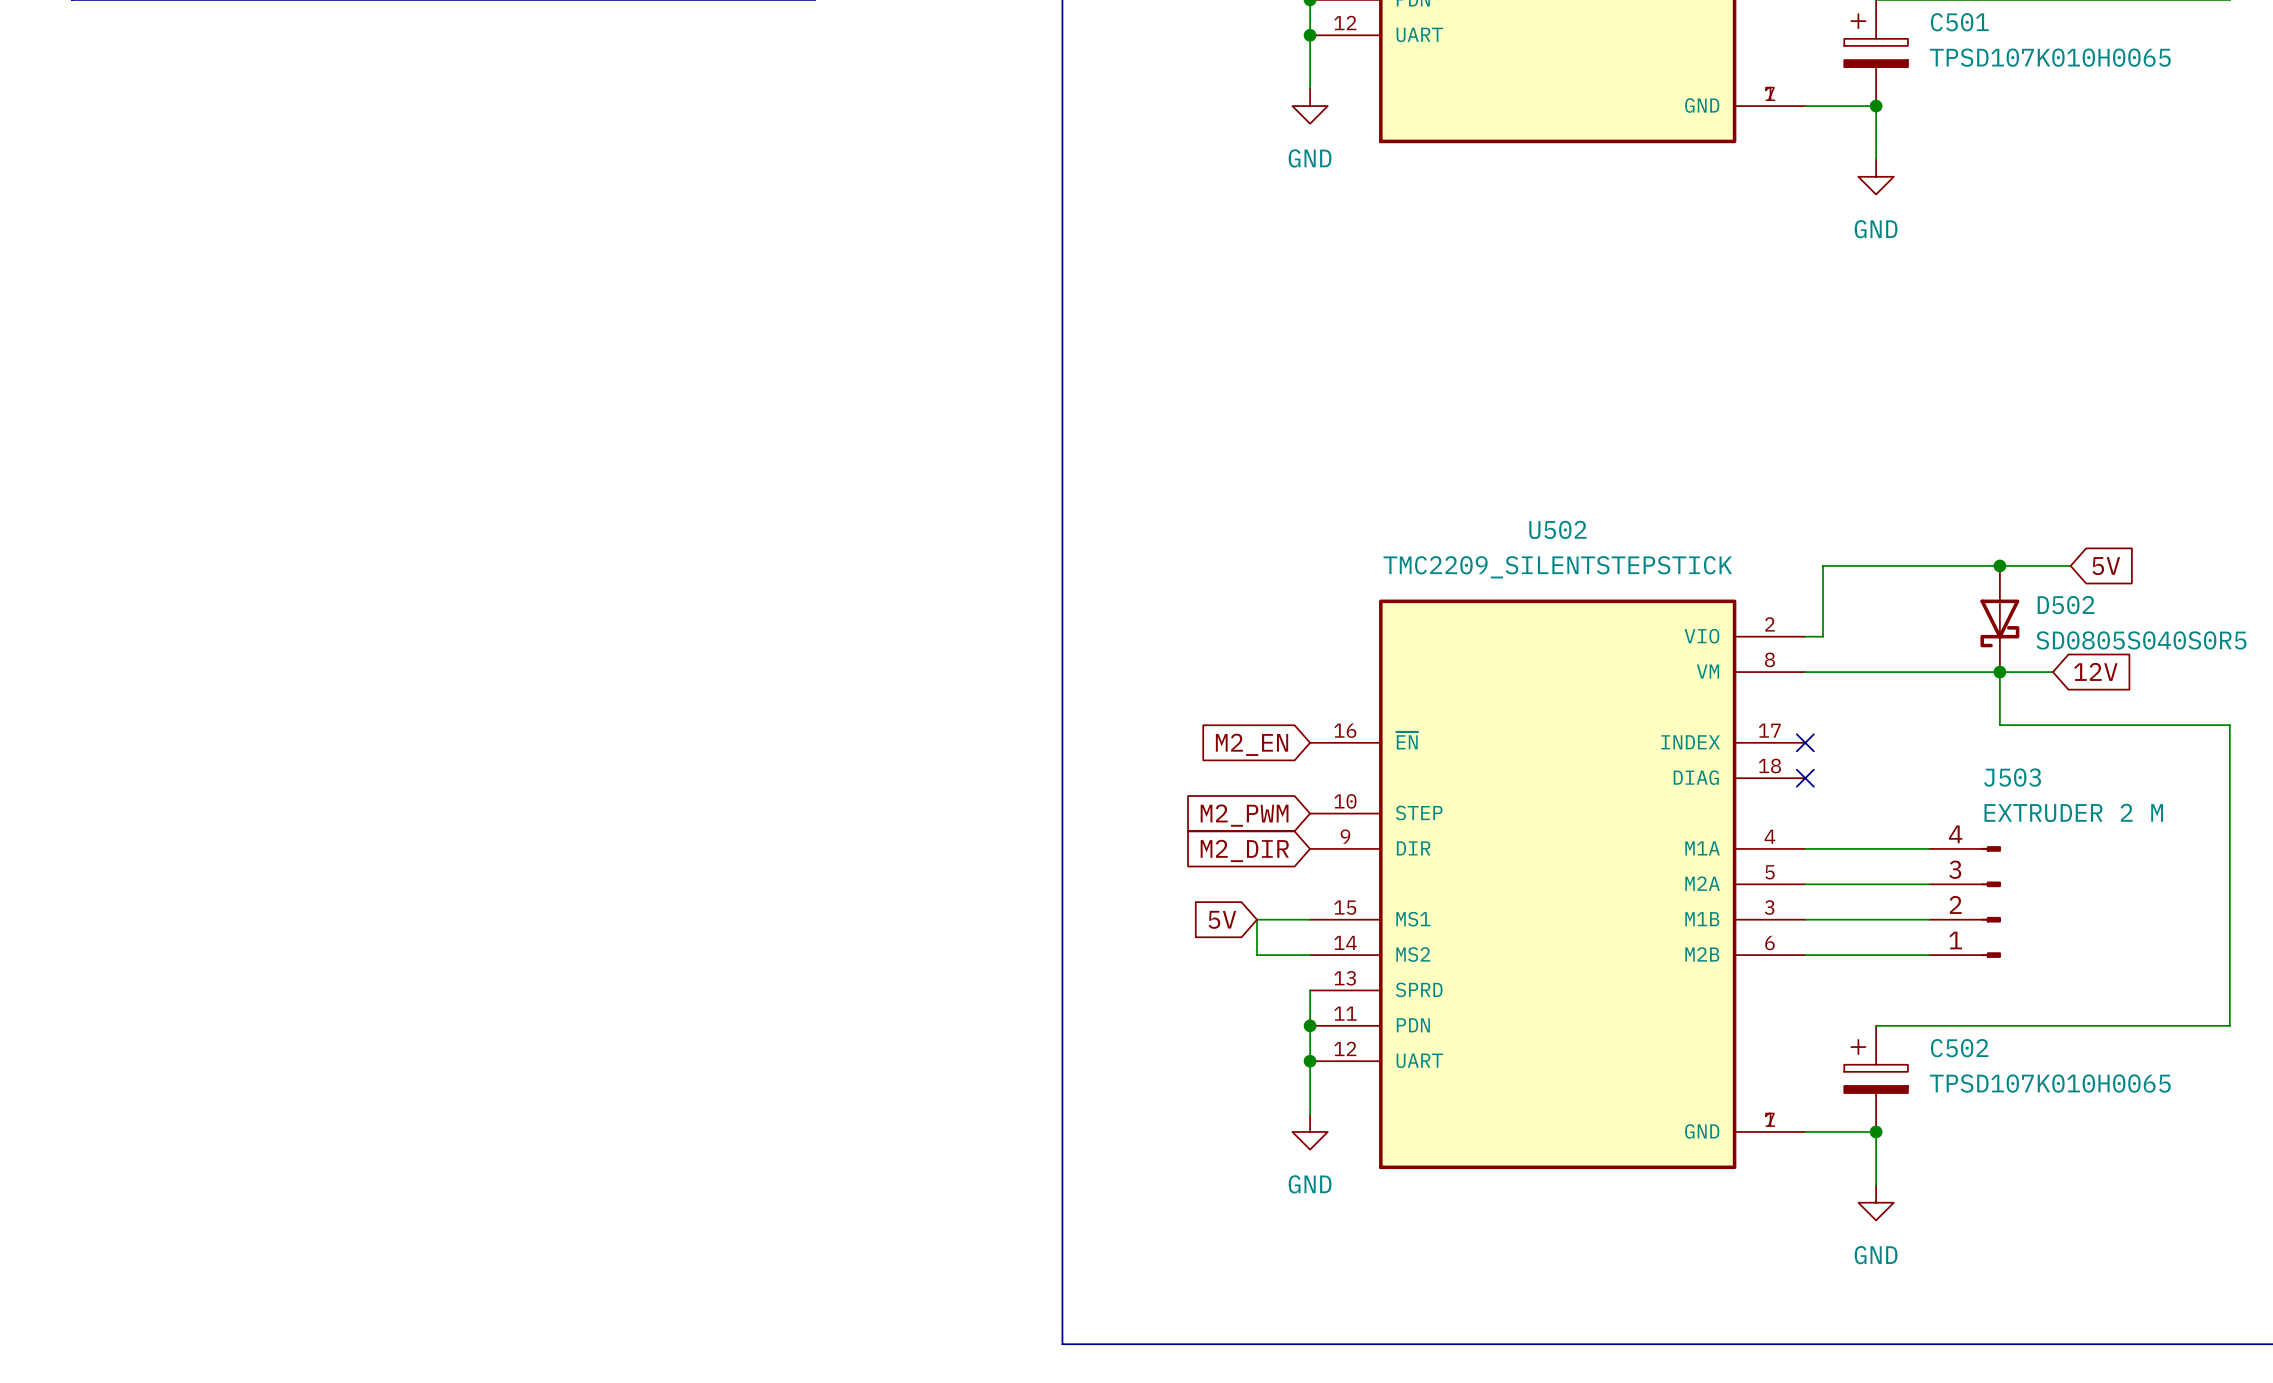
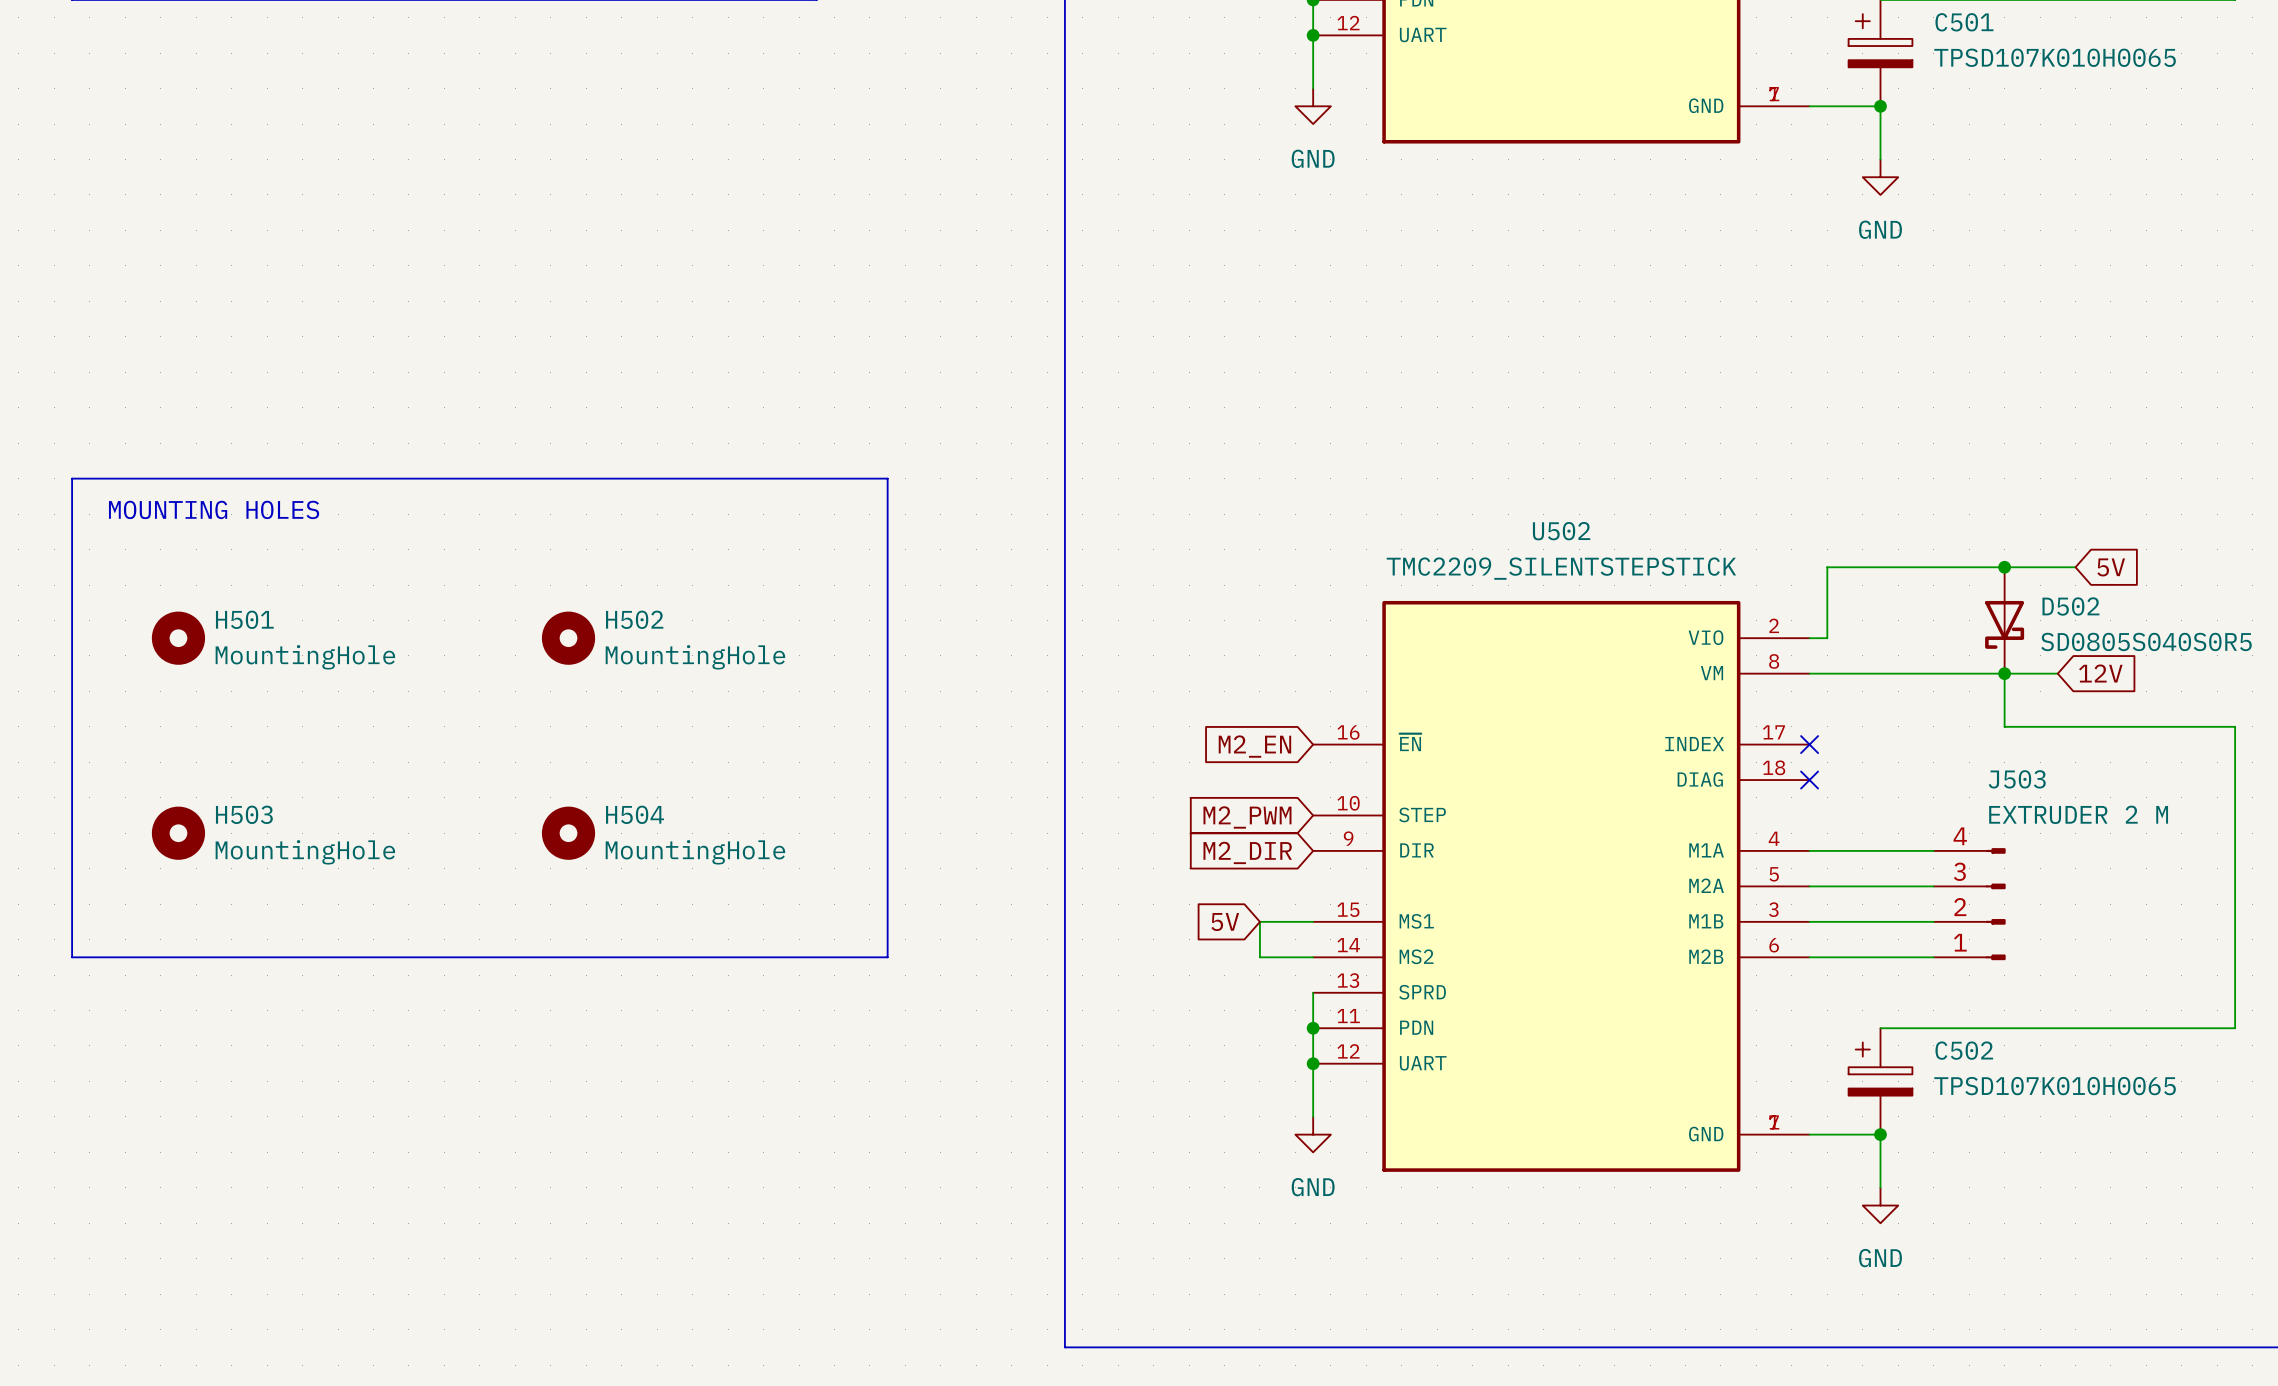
line: none -> (72, 478) (887, 478) (887, 957) (72, 957) (72, 478)
text: none -> MOUNTING HOLES (214, 509)
H501: none -> MountingHole (178, 638)
H502: none -> MountingHole (568, 638)
H503: none -> MountingHole (178, 833)
H504: none -> MountingHole (568, 833)

